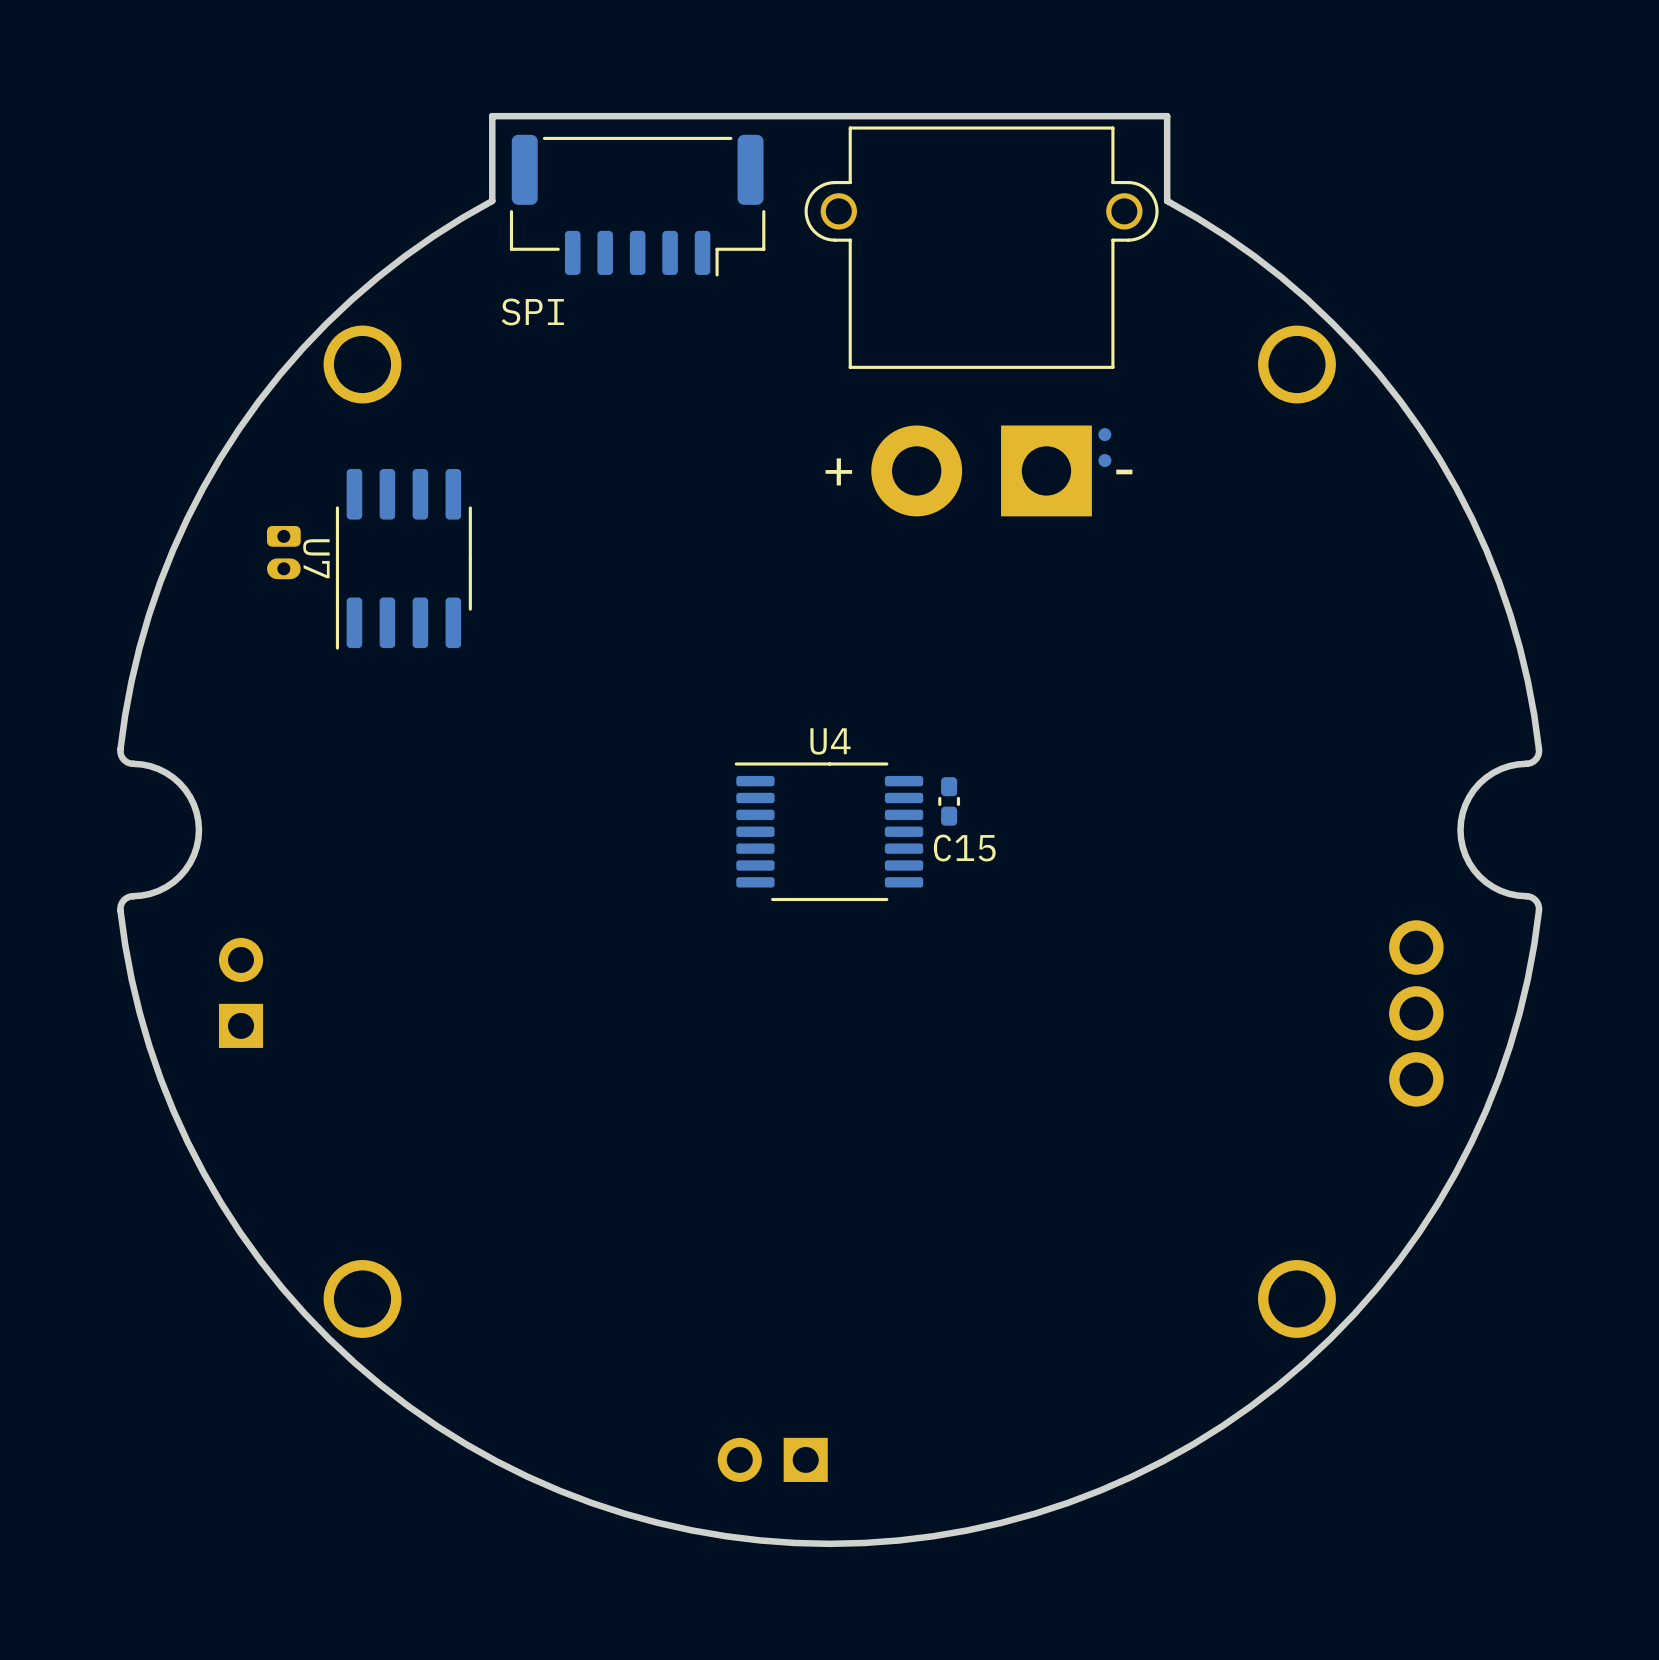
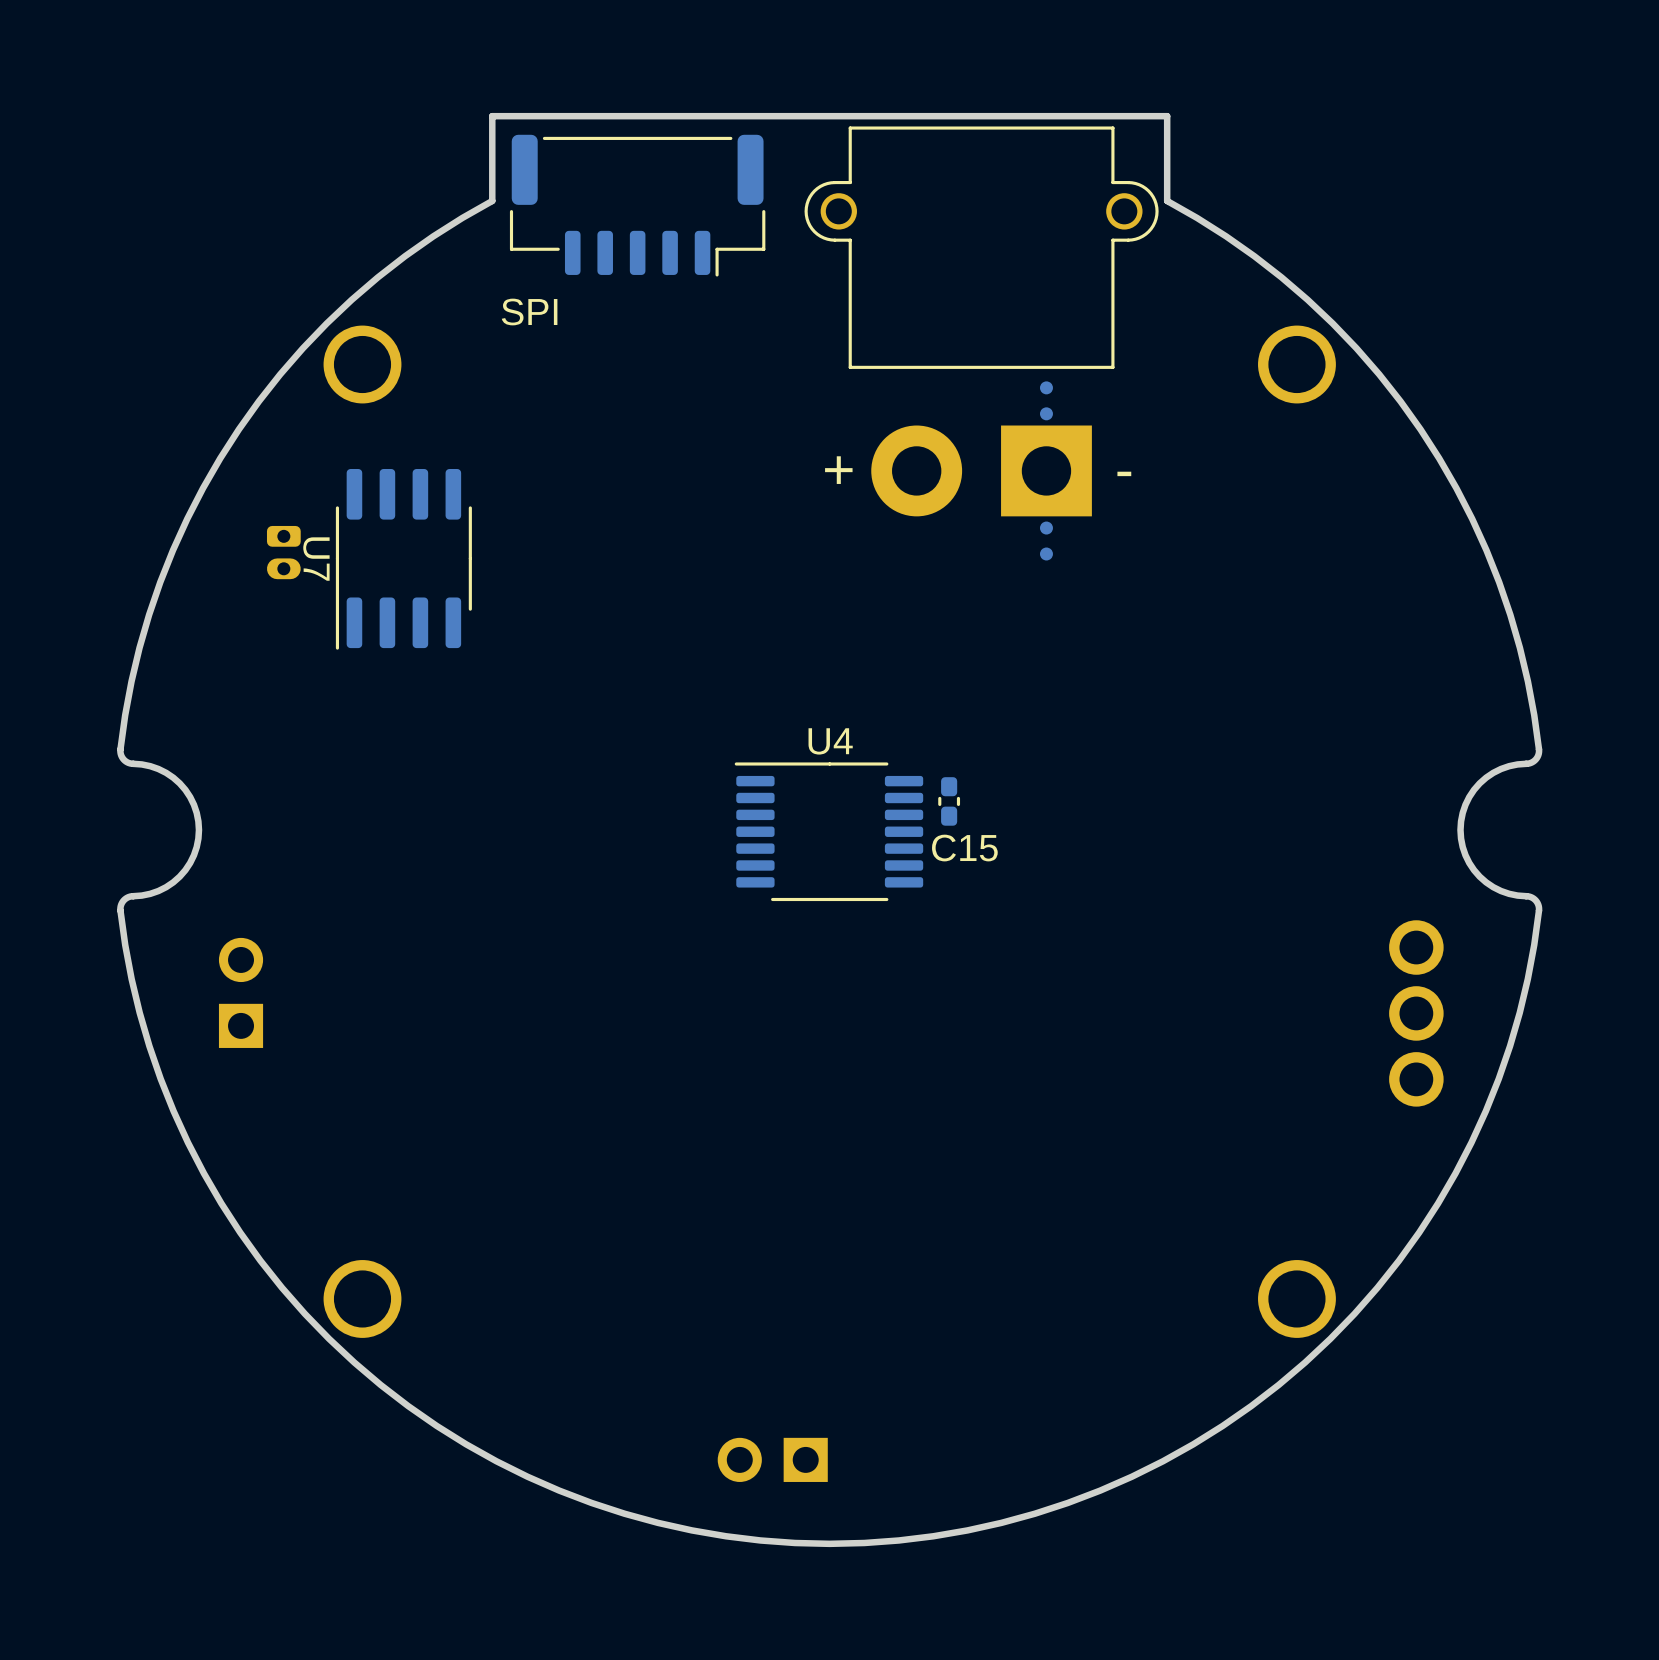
part: none -> (1046, 400)
part: (1104, 447) -> none
part: none -> (1046, 541)

